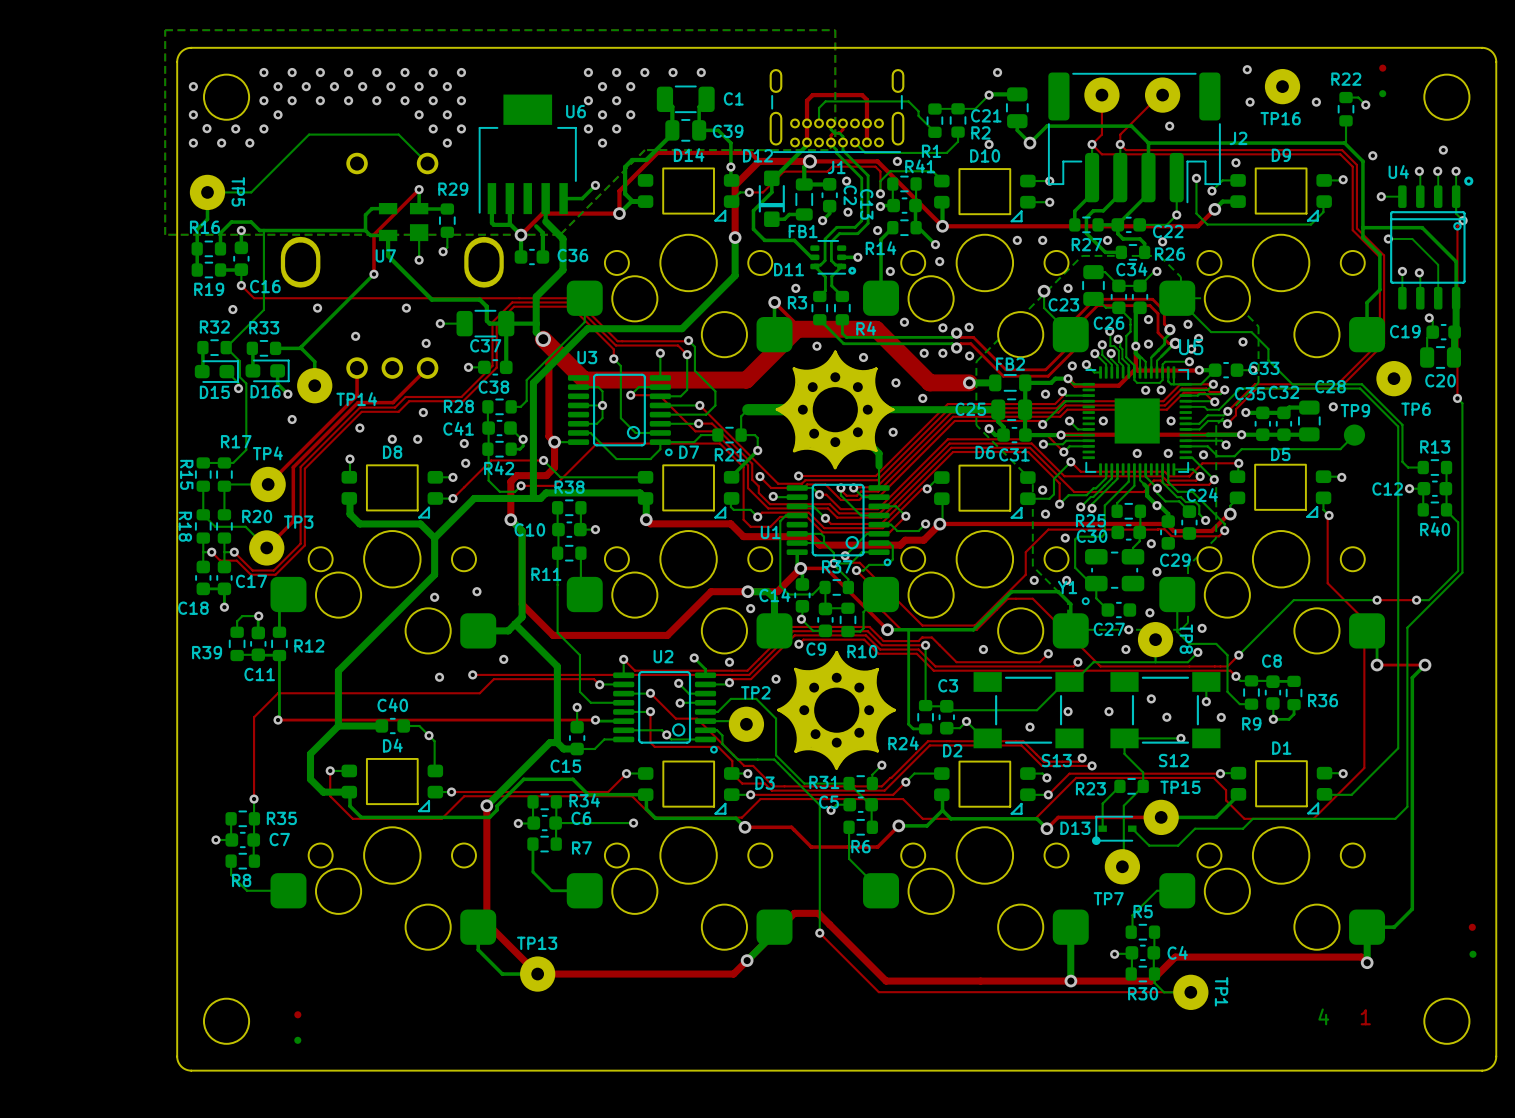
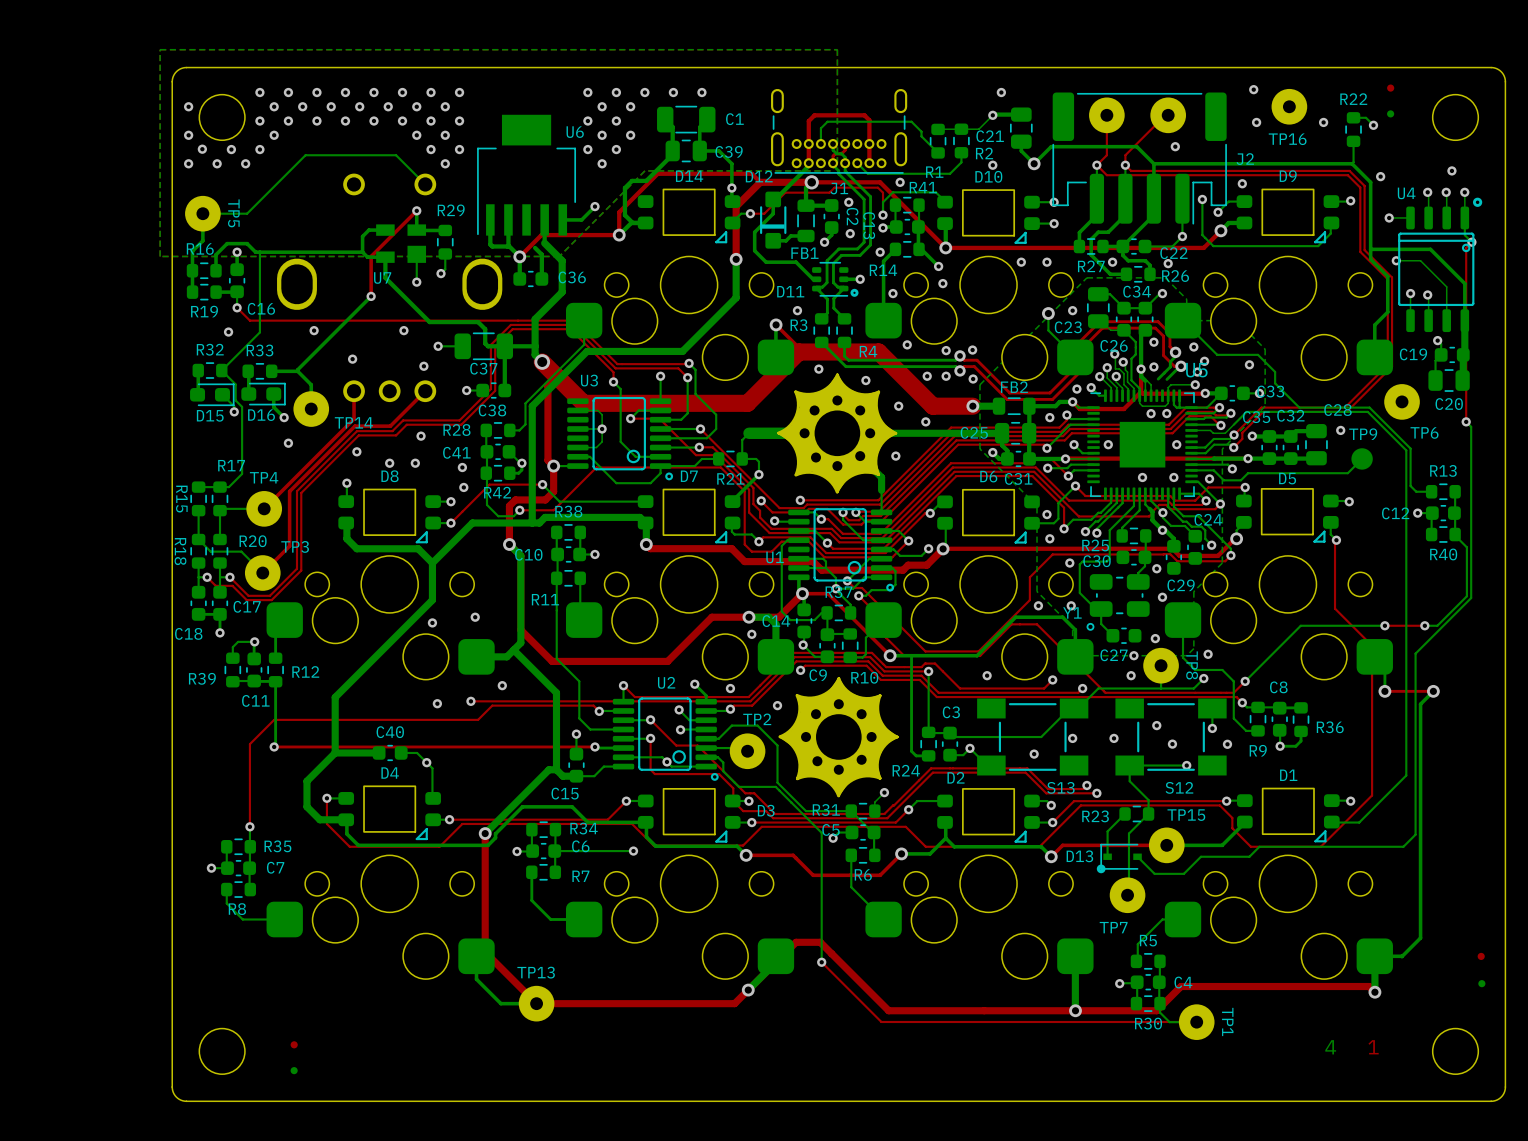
bottom track: (1152, 356) (1151, 372) -> none
bottom track: (1161, 356) (1156, 360) (1156, 372) -> none

